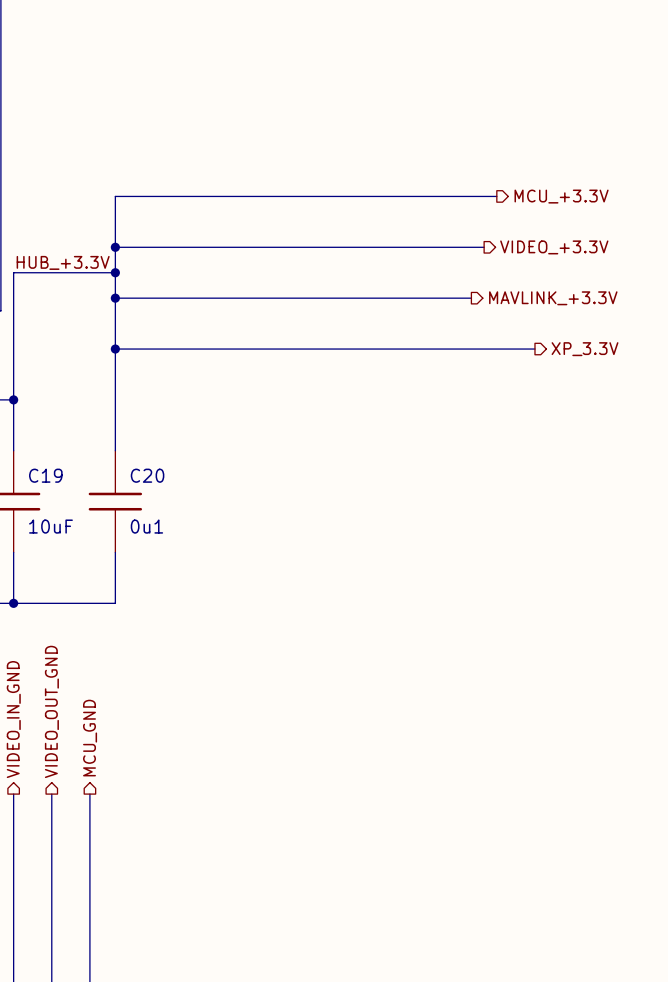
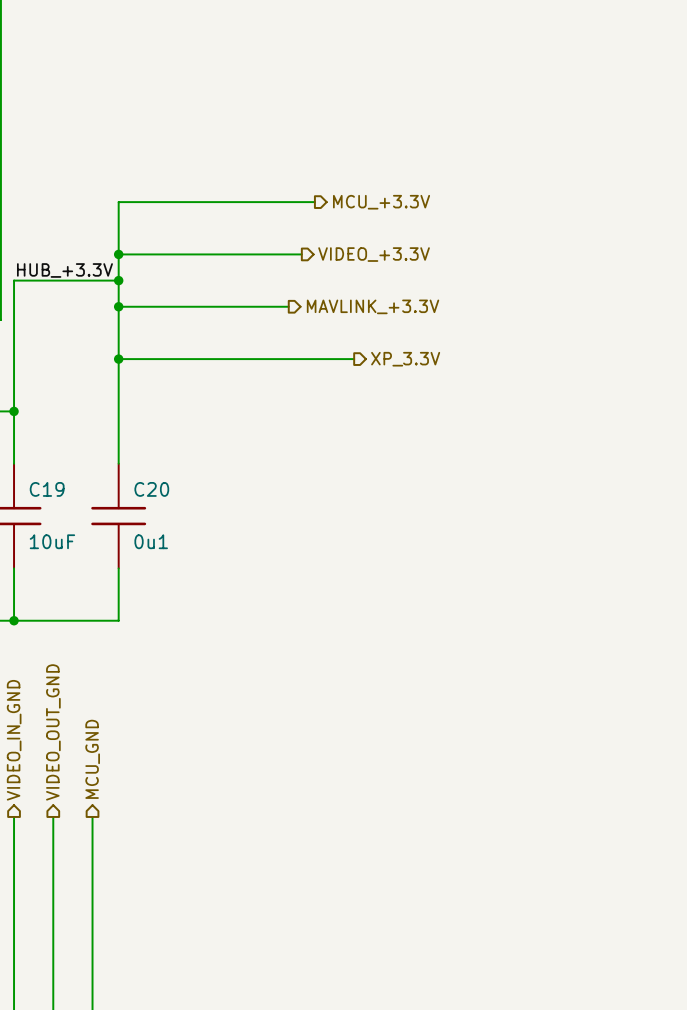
wire: (306, 196) (496, 196) -> none
hierarchical label position: MCU_+3.3V (561, 196) -> MCU_+3.3V (381, 202)
wire: (293, 247) (484, 247) -> none
hierarchical label position: VIDEO_+3.3V (554, 247) -> VIDEO_+3.3V (374, 254)
wire: (280, 298) (471, 298) -> none
hierarchical label position: MAVLINK_+3.3V (553, 298) -> MAVLINK_+3.3V (373, 306)
wire: (344, 349) (534, 349) -> none
hierarchical label position: XP_3.3V (585, 349) -> XP_3.3V (405, 359)

